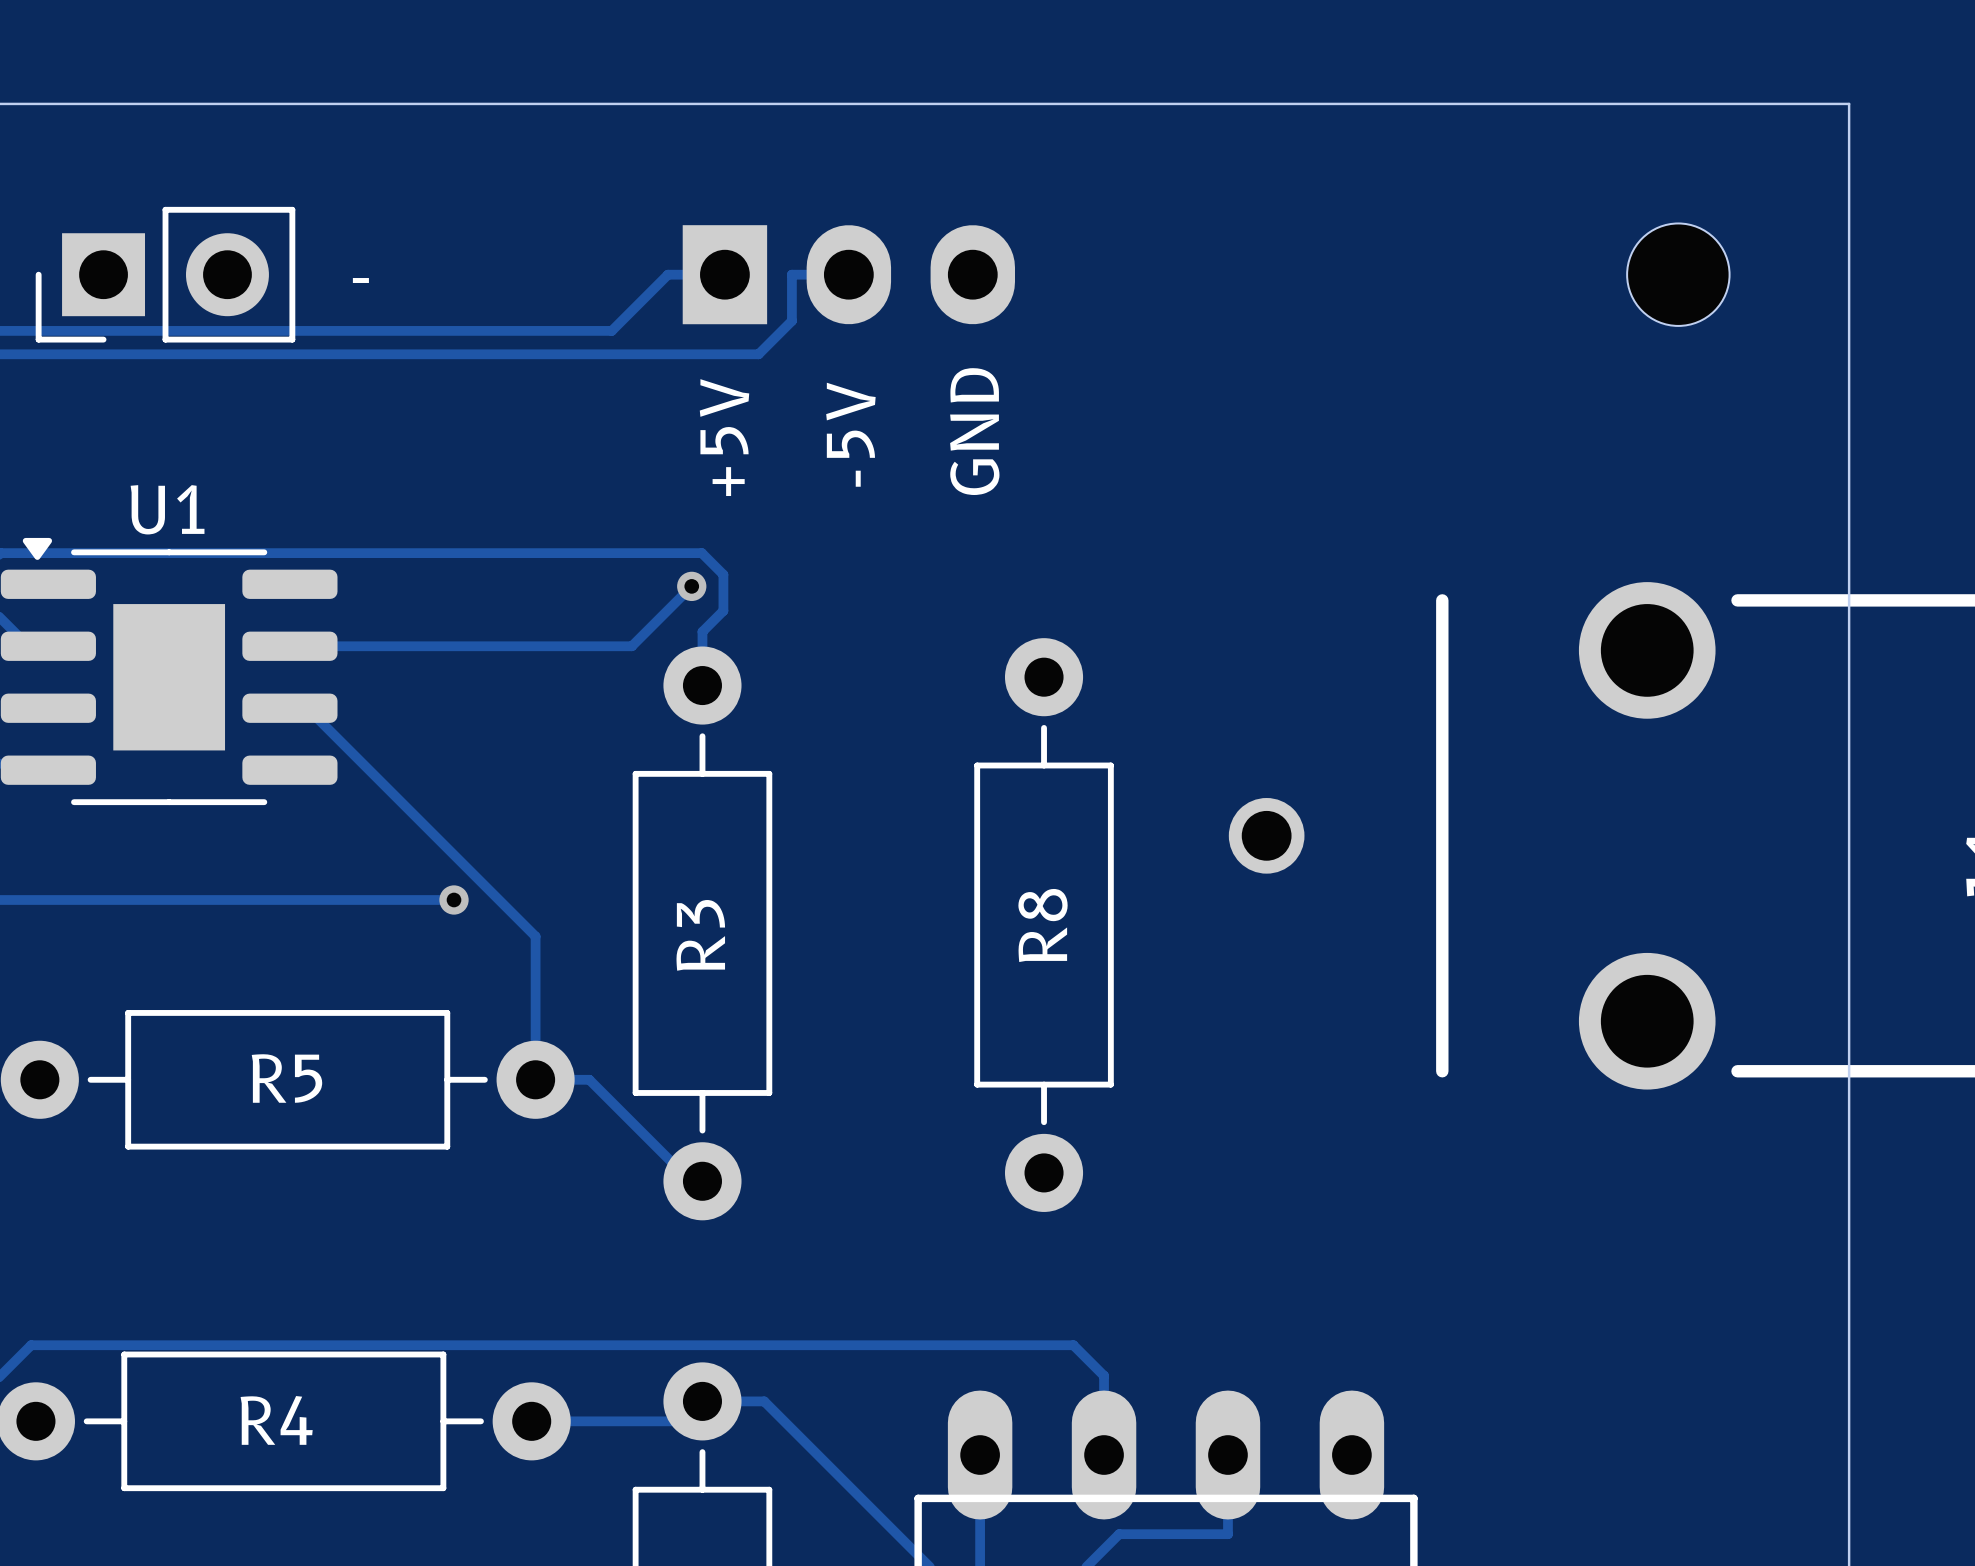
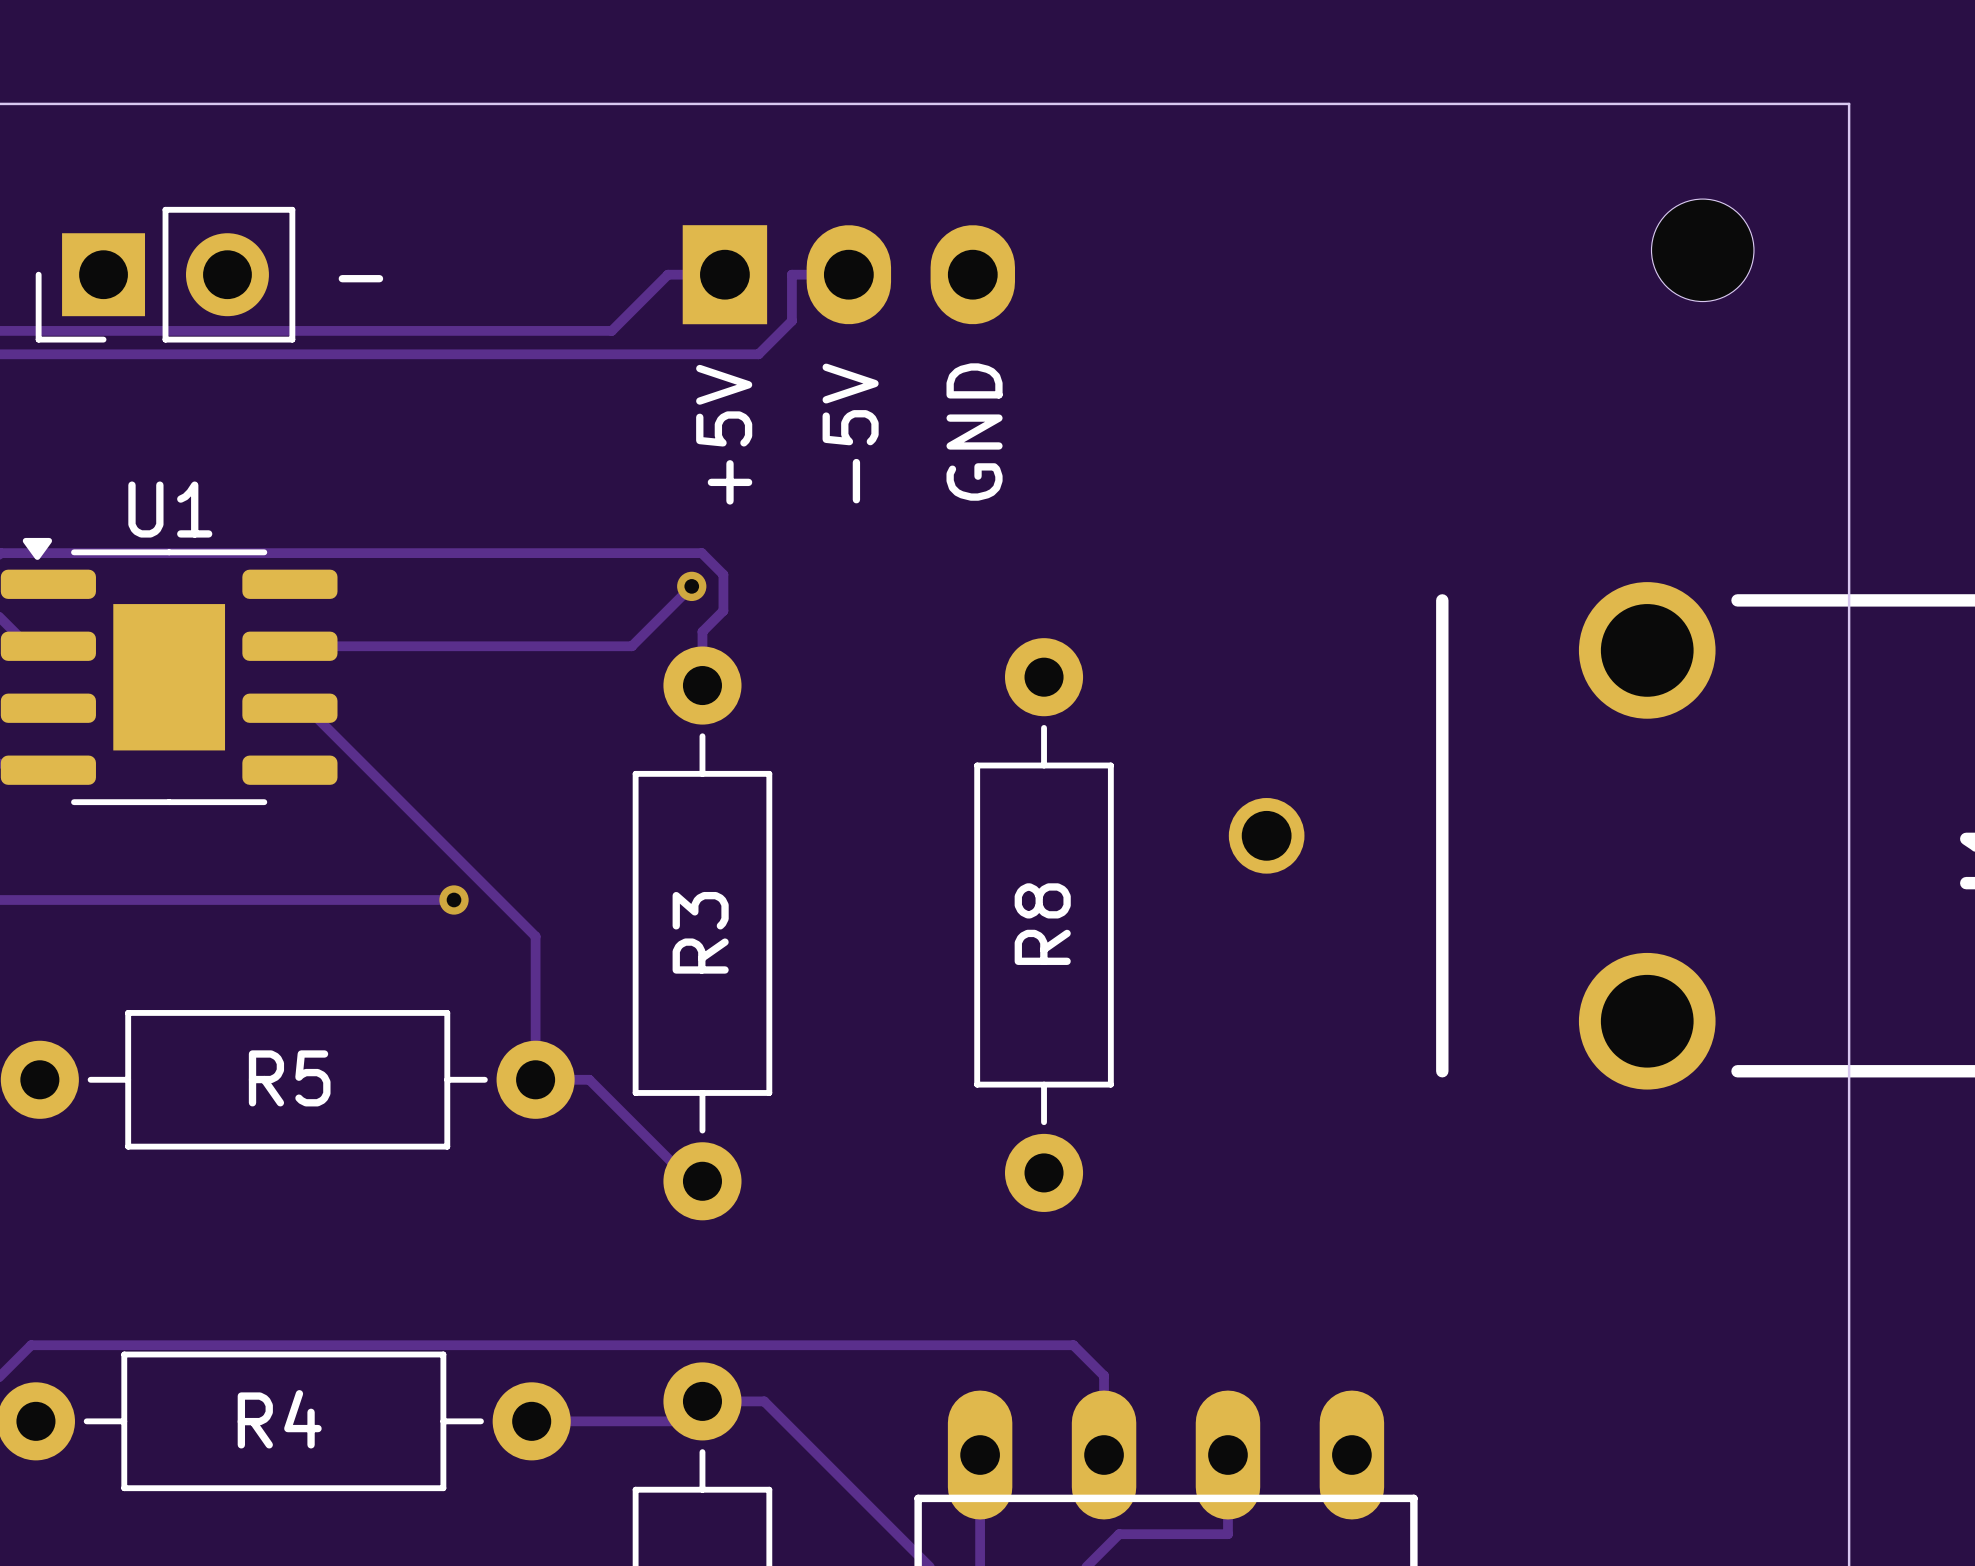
part position: (1678, 274) -> (1702, 250)

